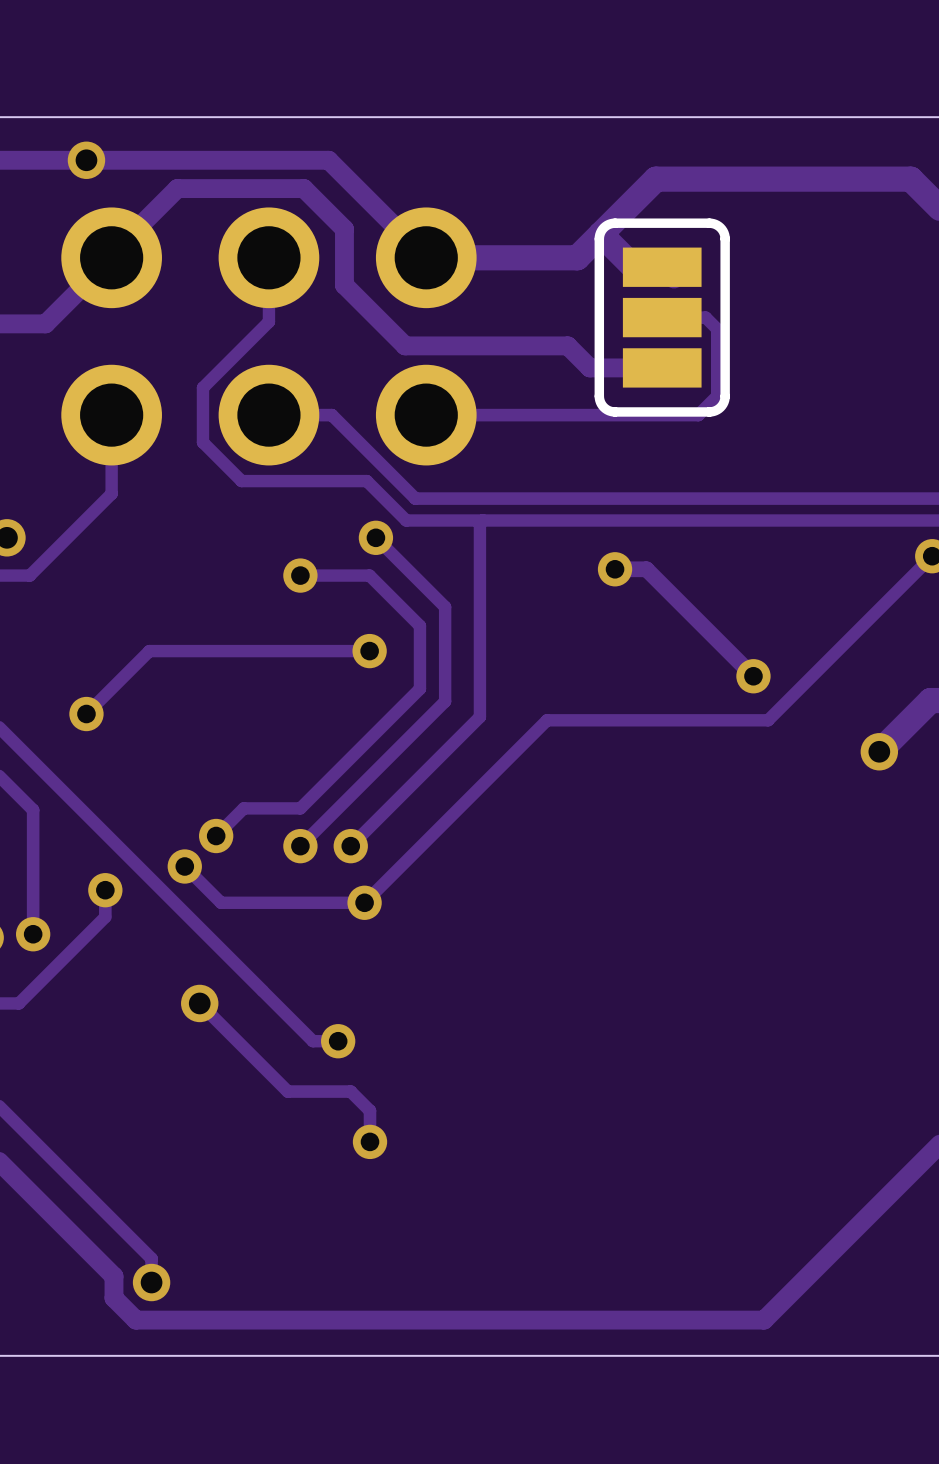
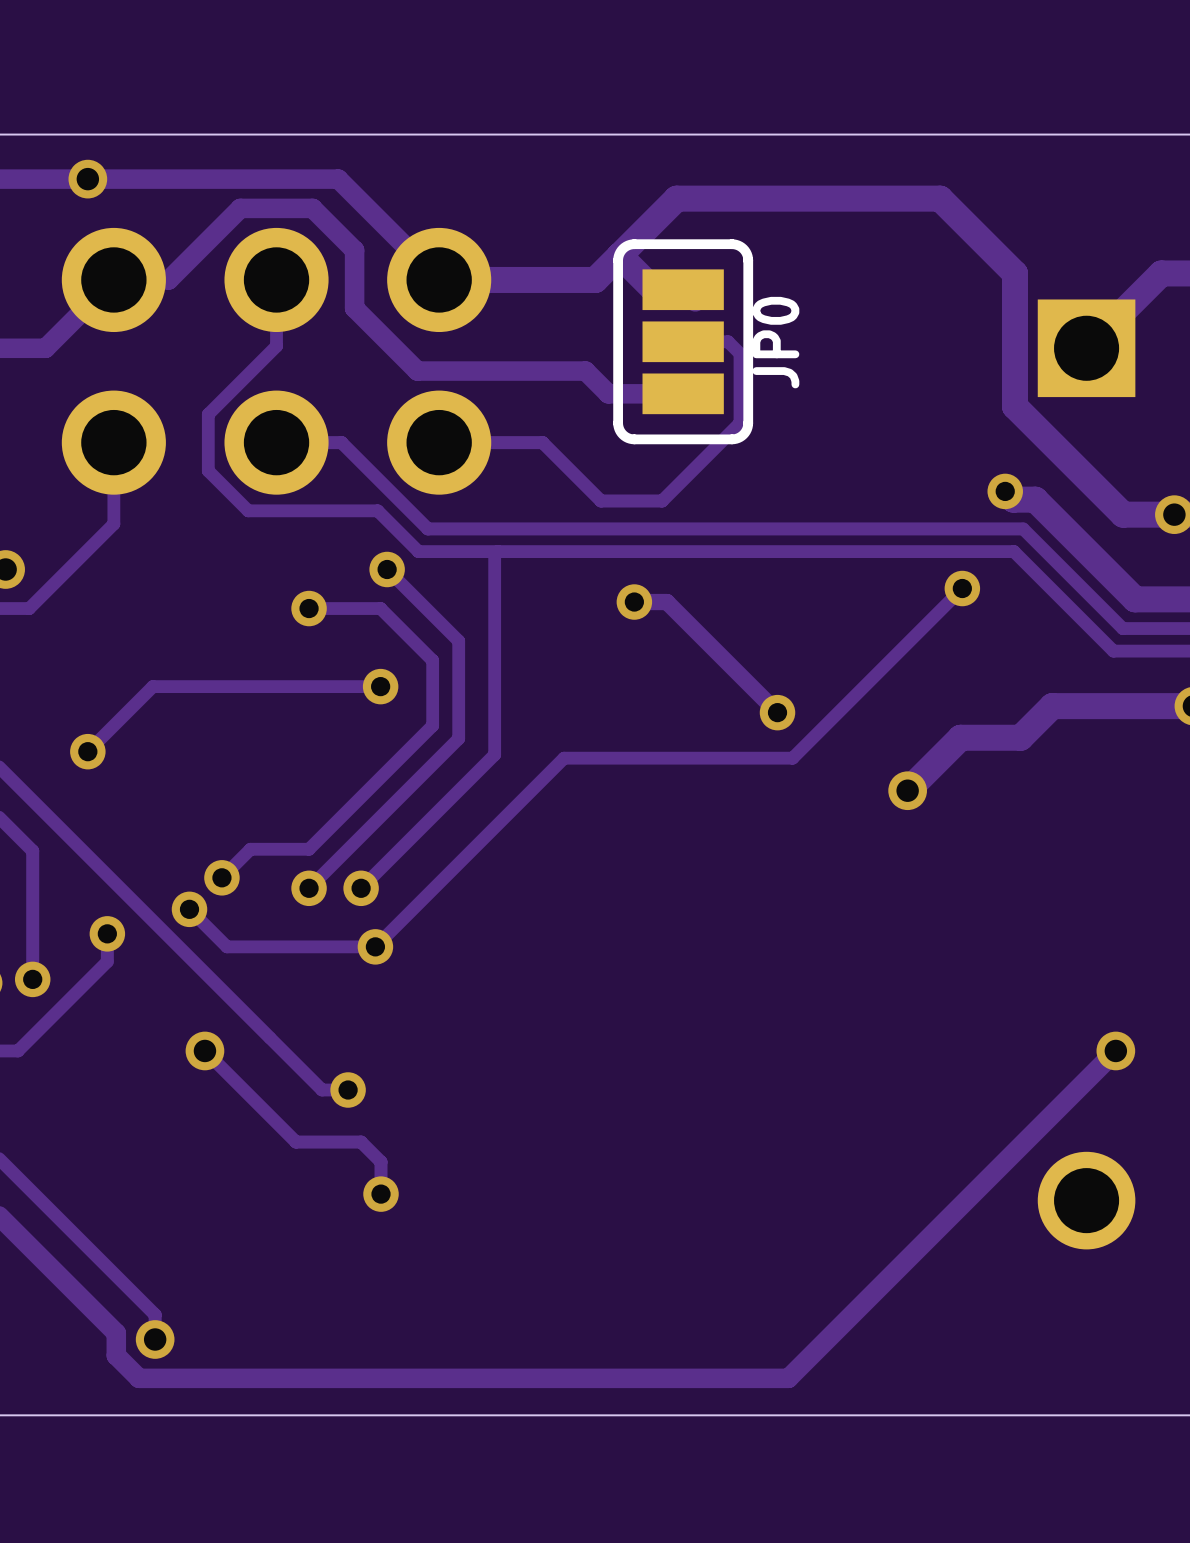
track: (233, 188) (177, 188) (111, 254) (111, 257) -> (240, 208) (168, 279) (113, 279)
JP0 name: none -> JP0 (775, 342)
track: (698, 415) (526, 415) -> (720, 442) (662, 501) (601, 501) (542, 442)

